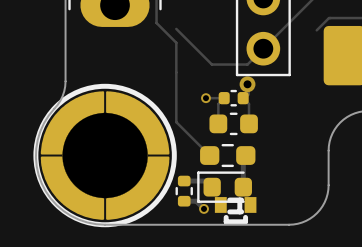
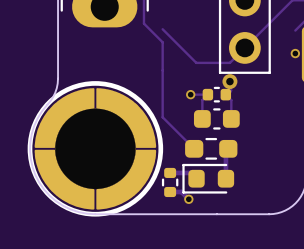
via: none -> (295, 53)
part: (235, 210) -> none

